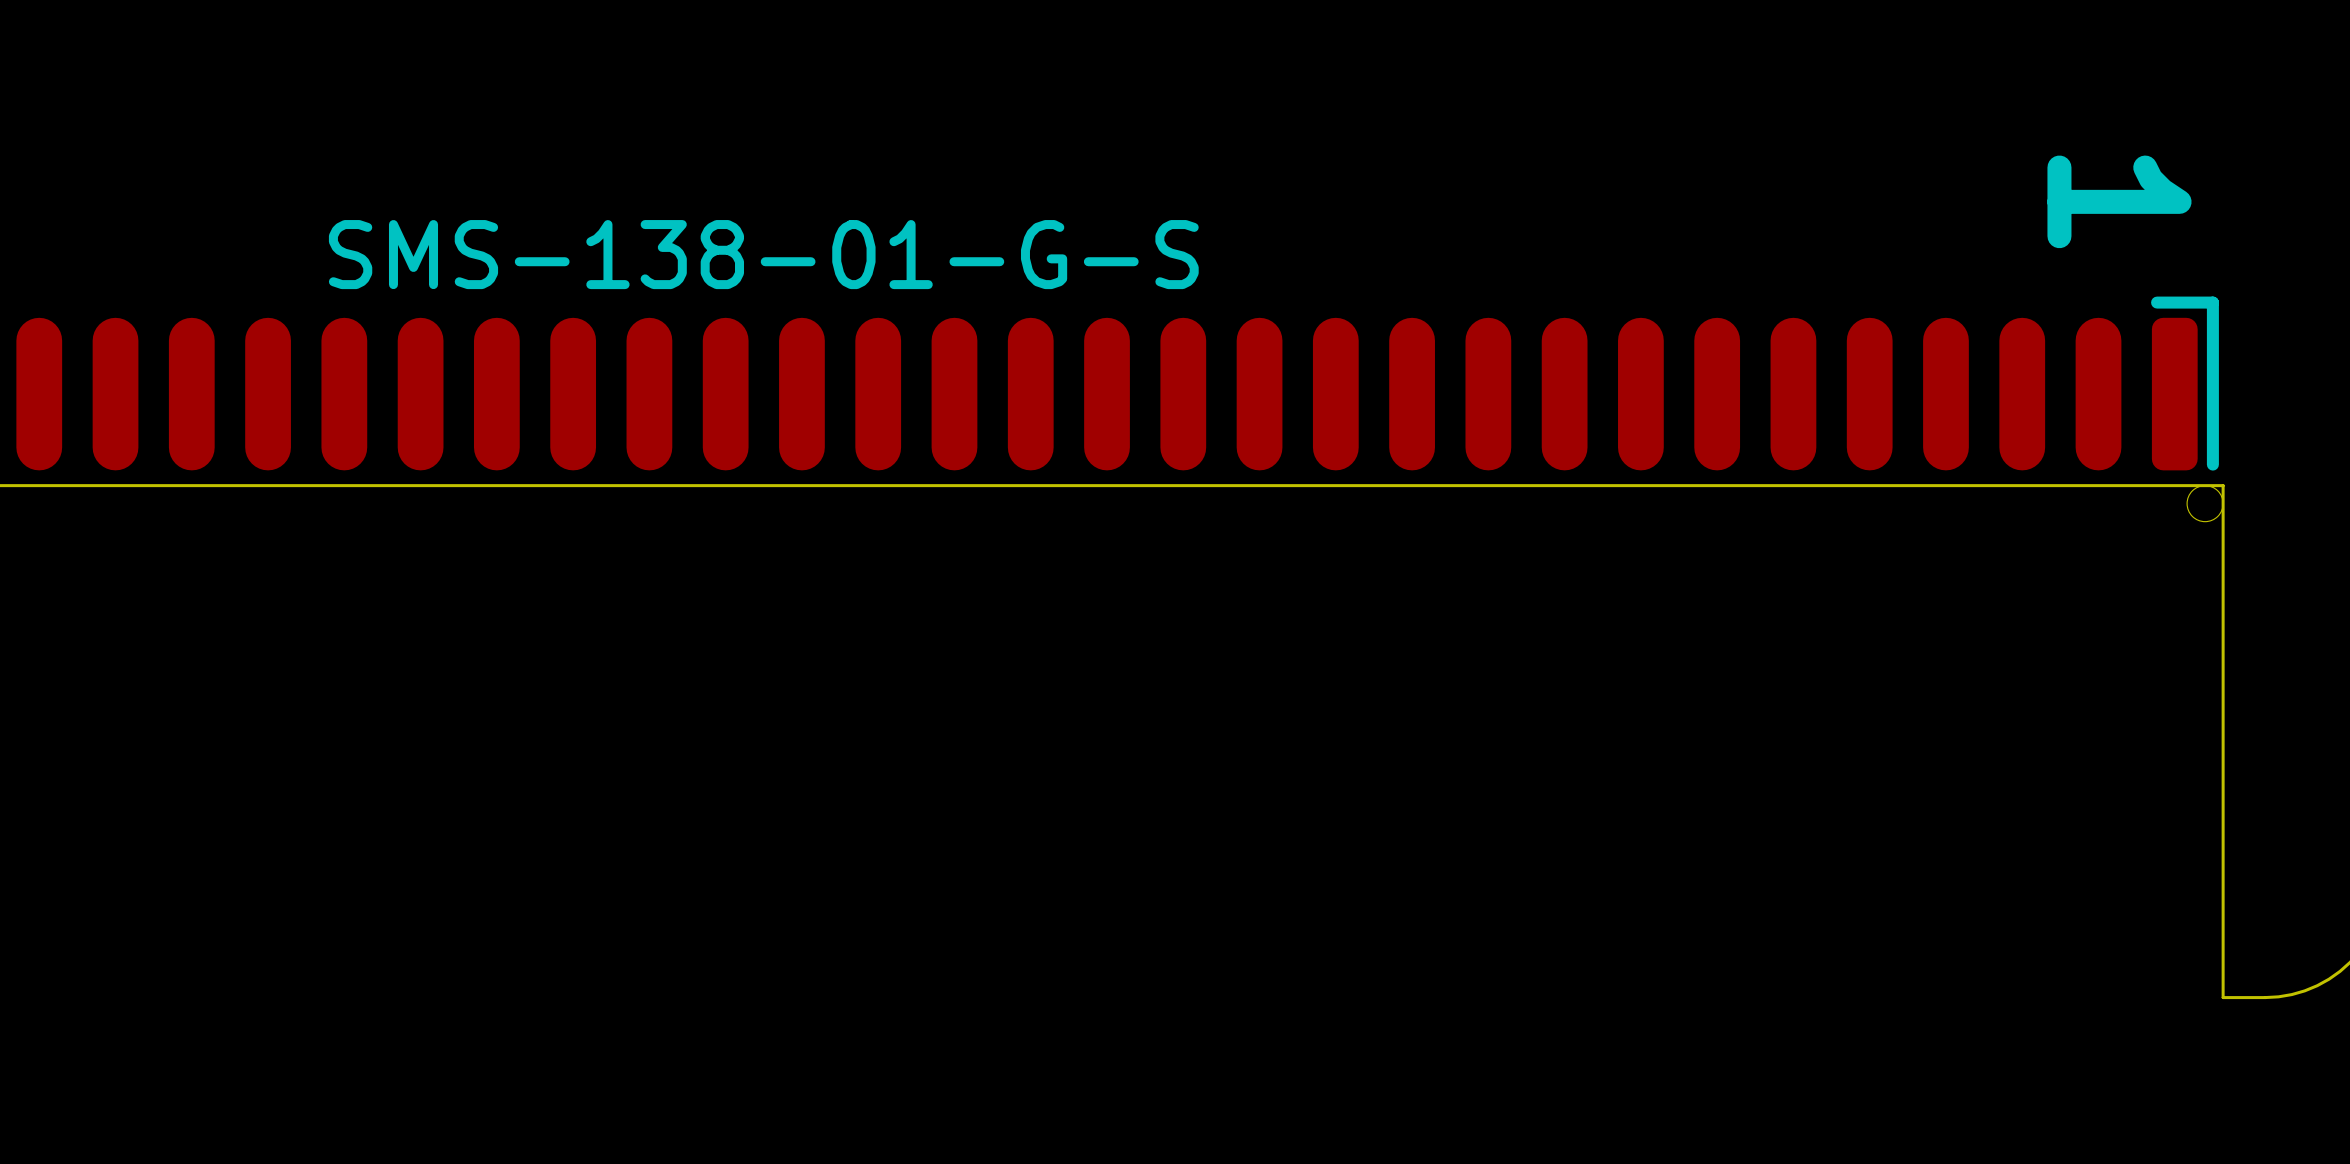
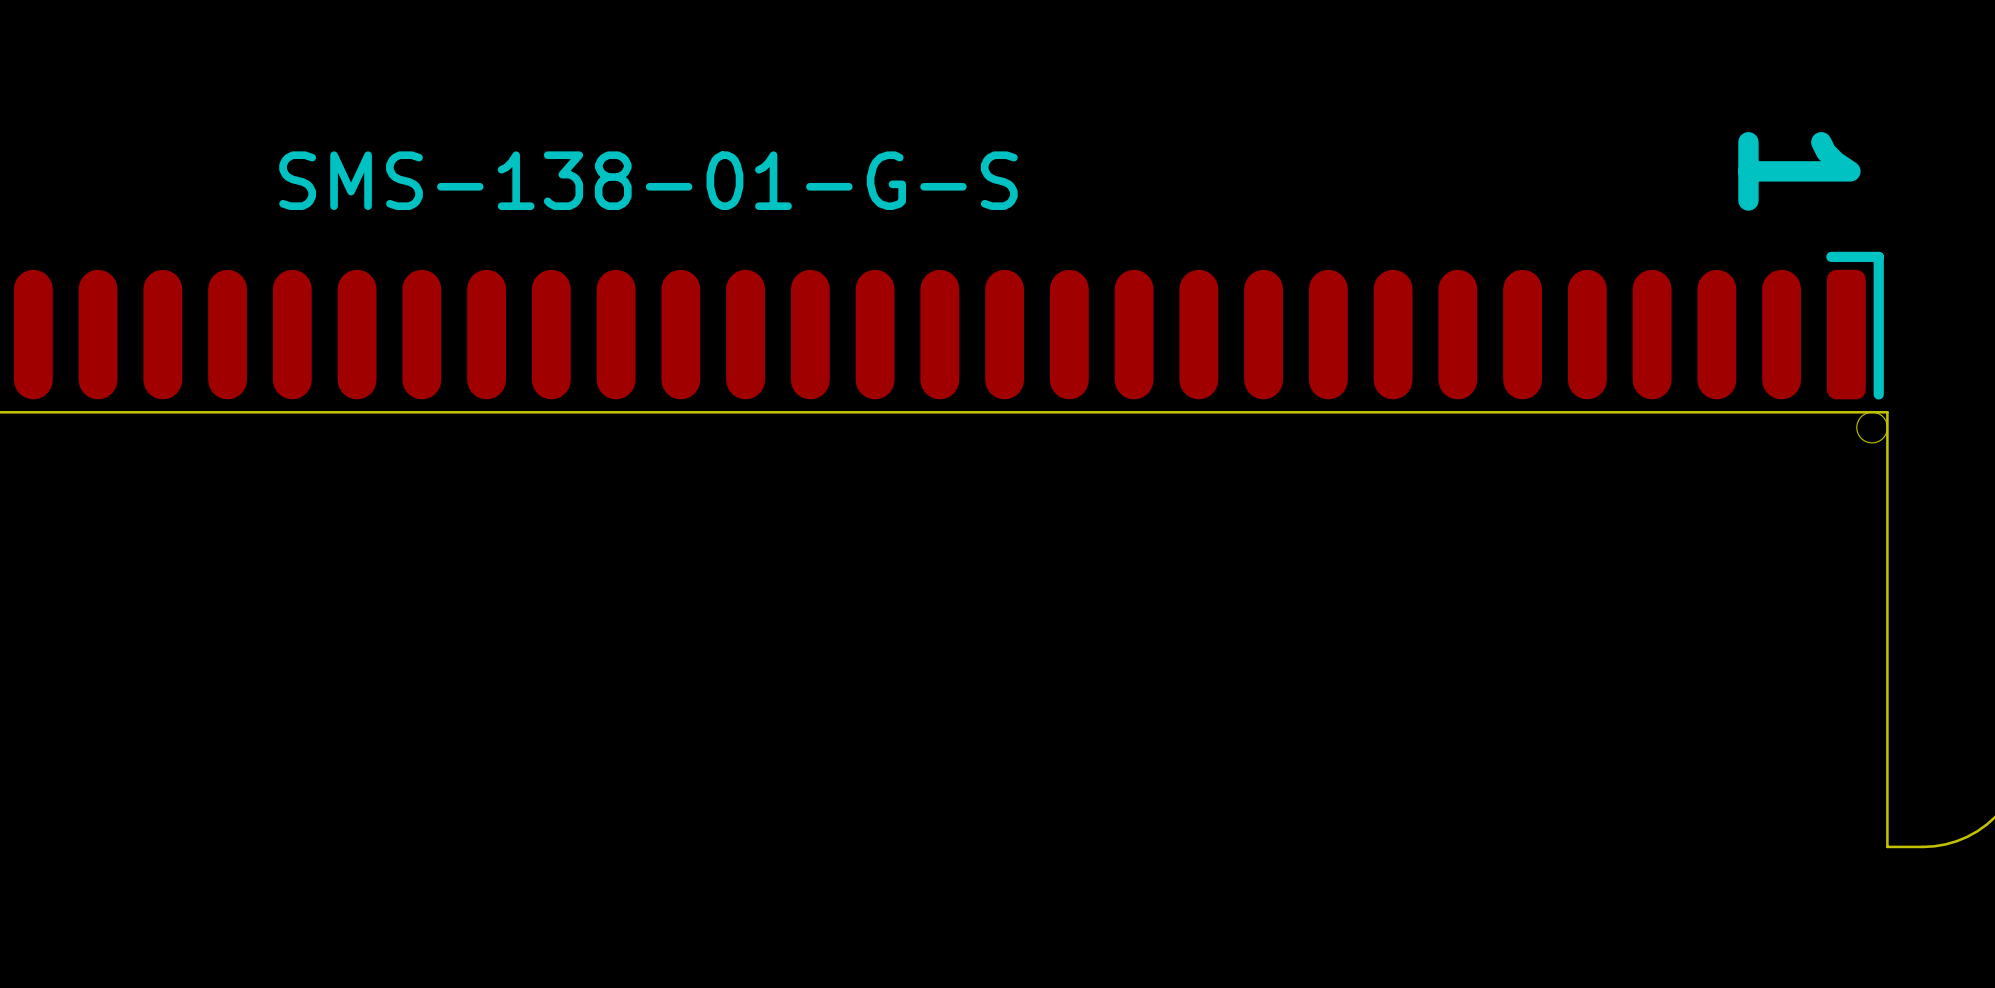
part value position: SMS-138-01-G-S (763, 254) -> SMS-138-01-G-S (648, 180)

